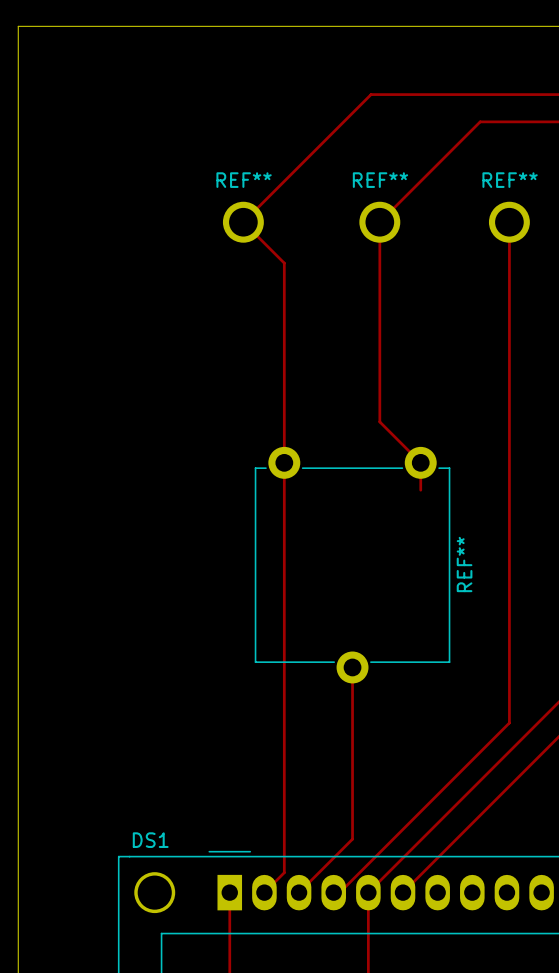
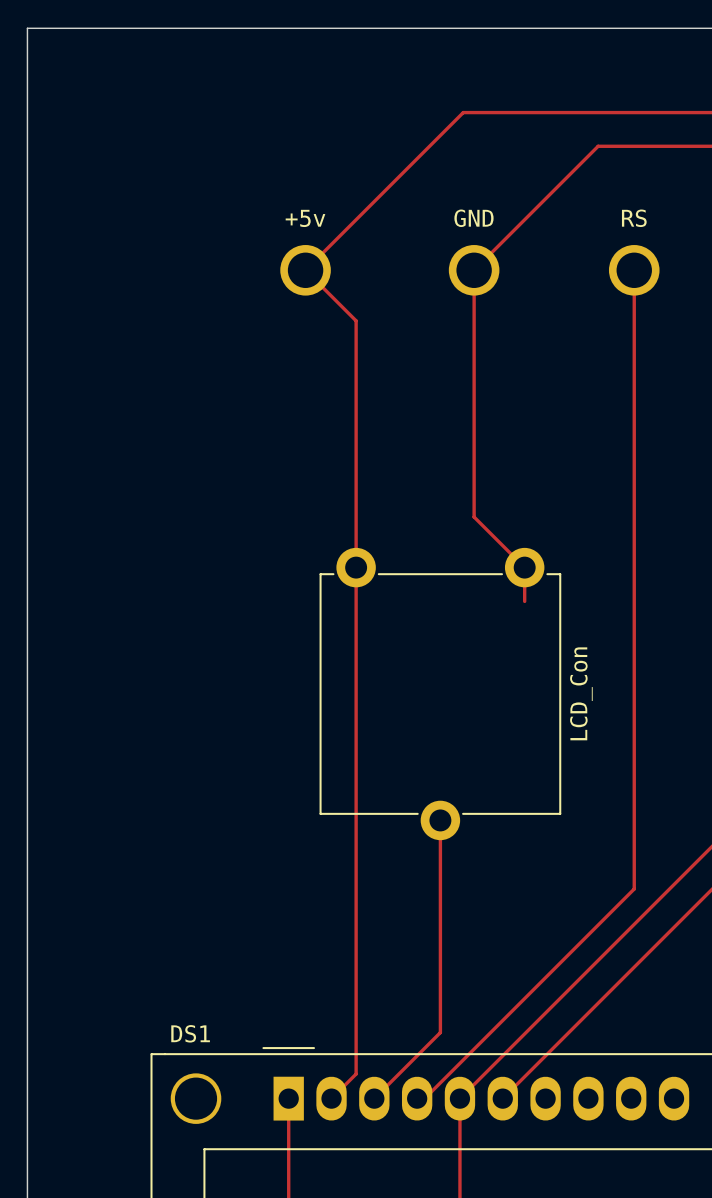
REF** name: REF** (244, 180) -> +5v (305, 218)
REF** name: REF** (380, 180) -> GND (473, 218)
REF** name: REF** (510, 180) -> RS (634, 218)
REF** name: REF** (464, 564) -> LCD_Con (581, 693)

